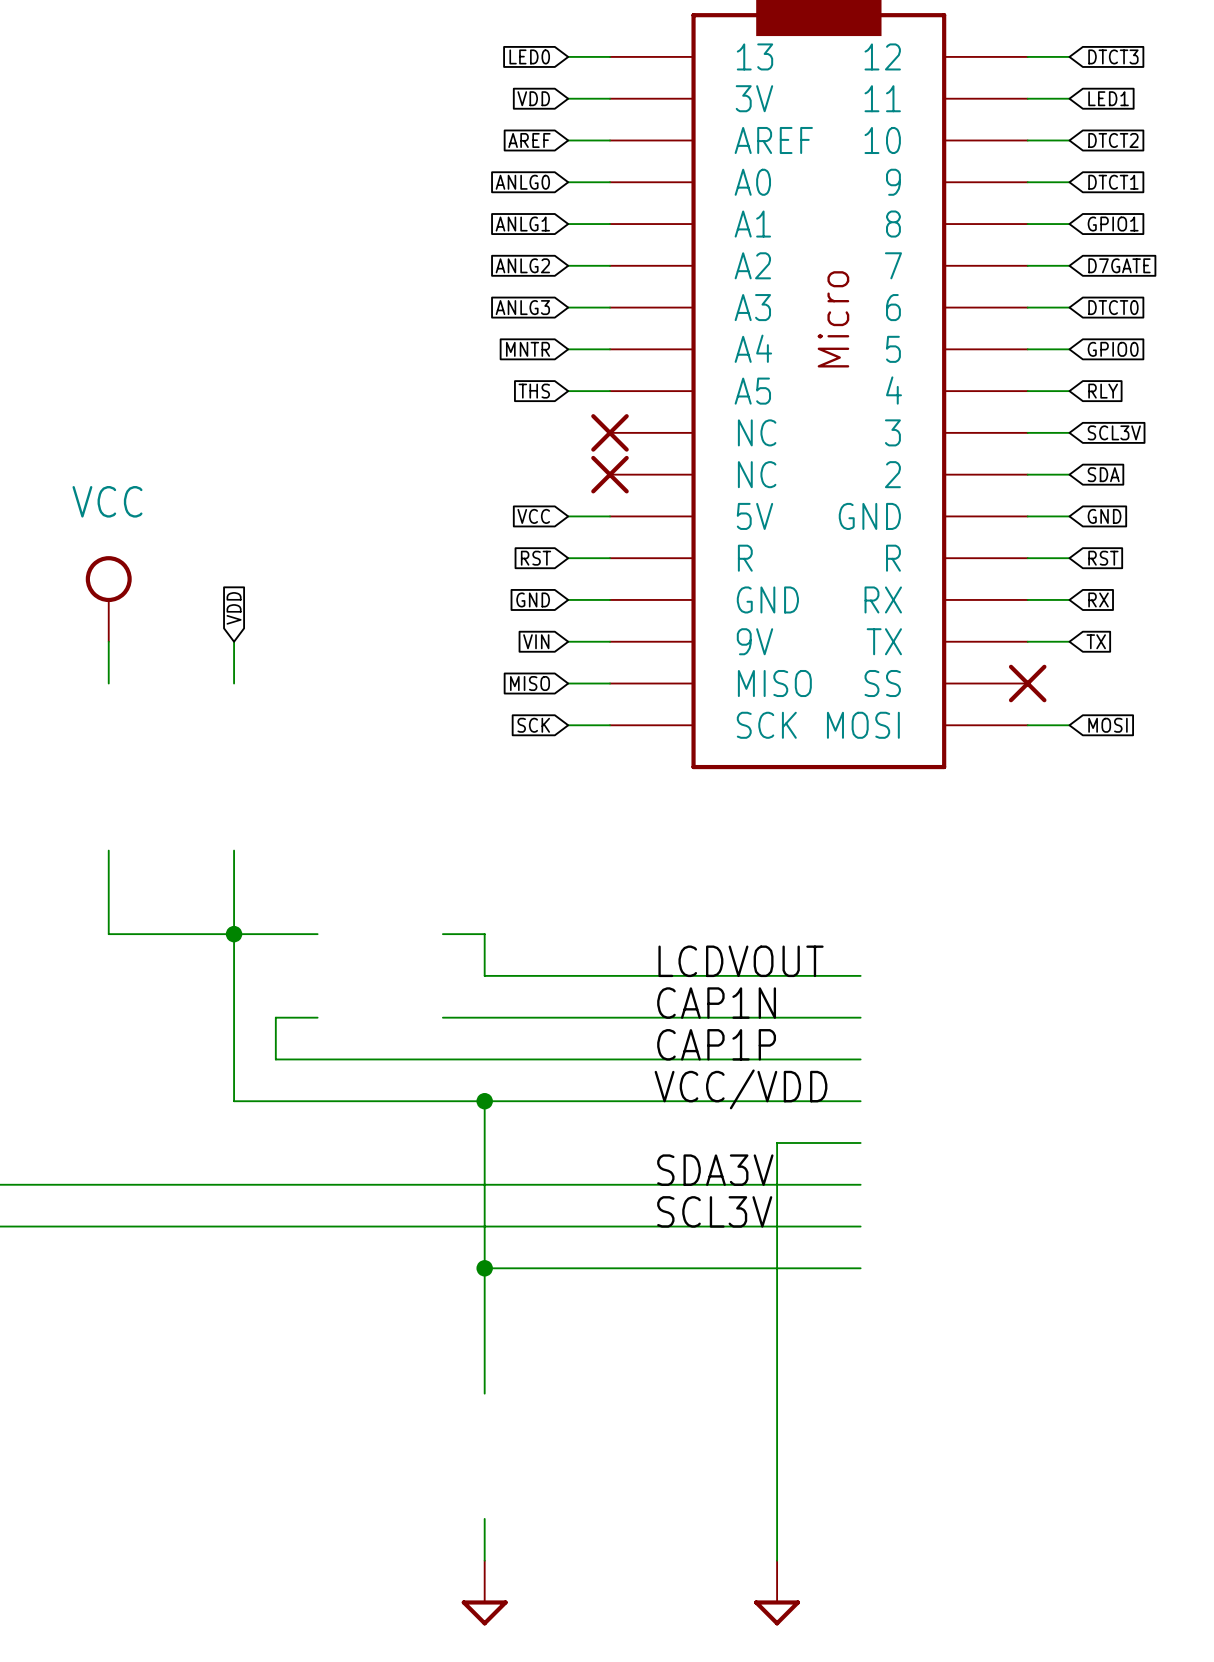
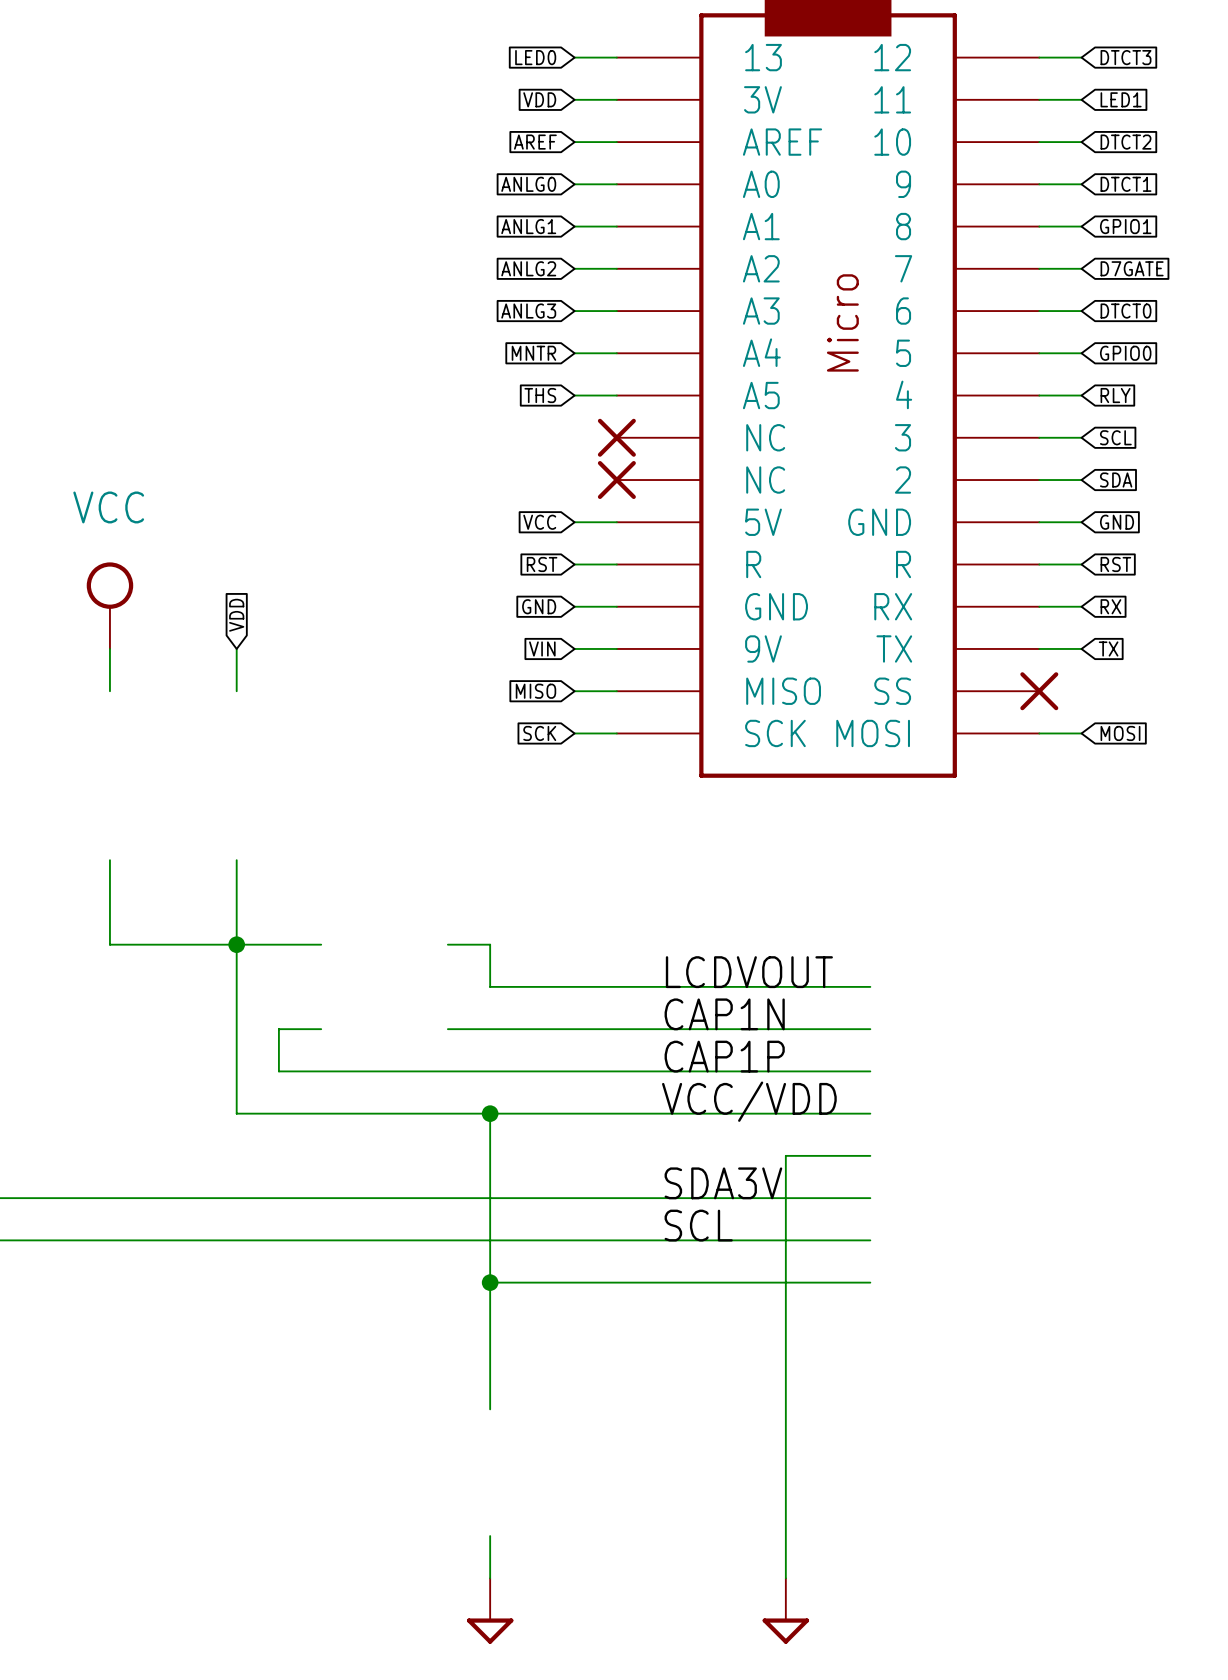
global label: SCL3V (1114, 432) -> SCL (1115, 437)
label: SCL3V (714, 1211) -> SCL (698, 1225)

